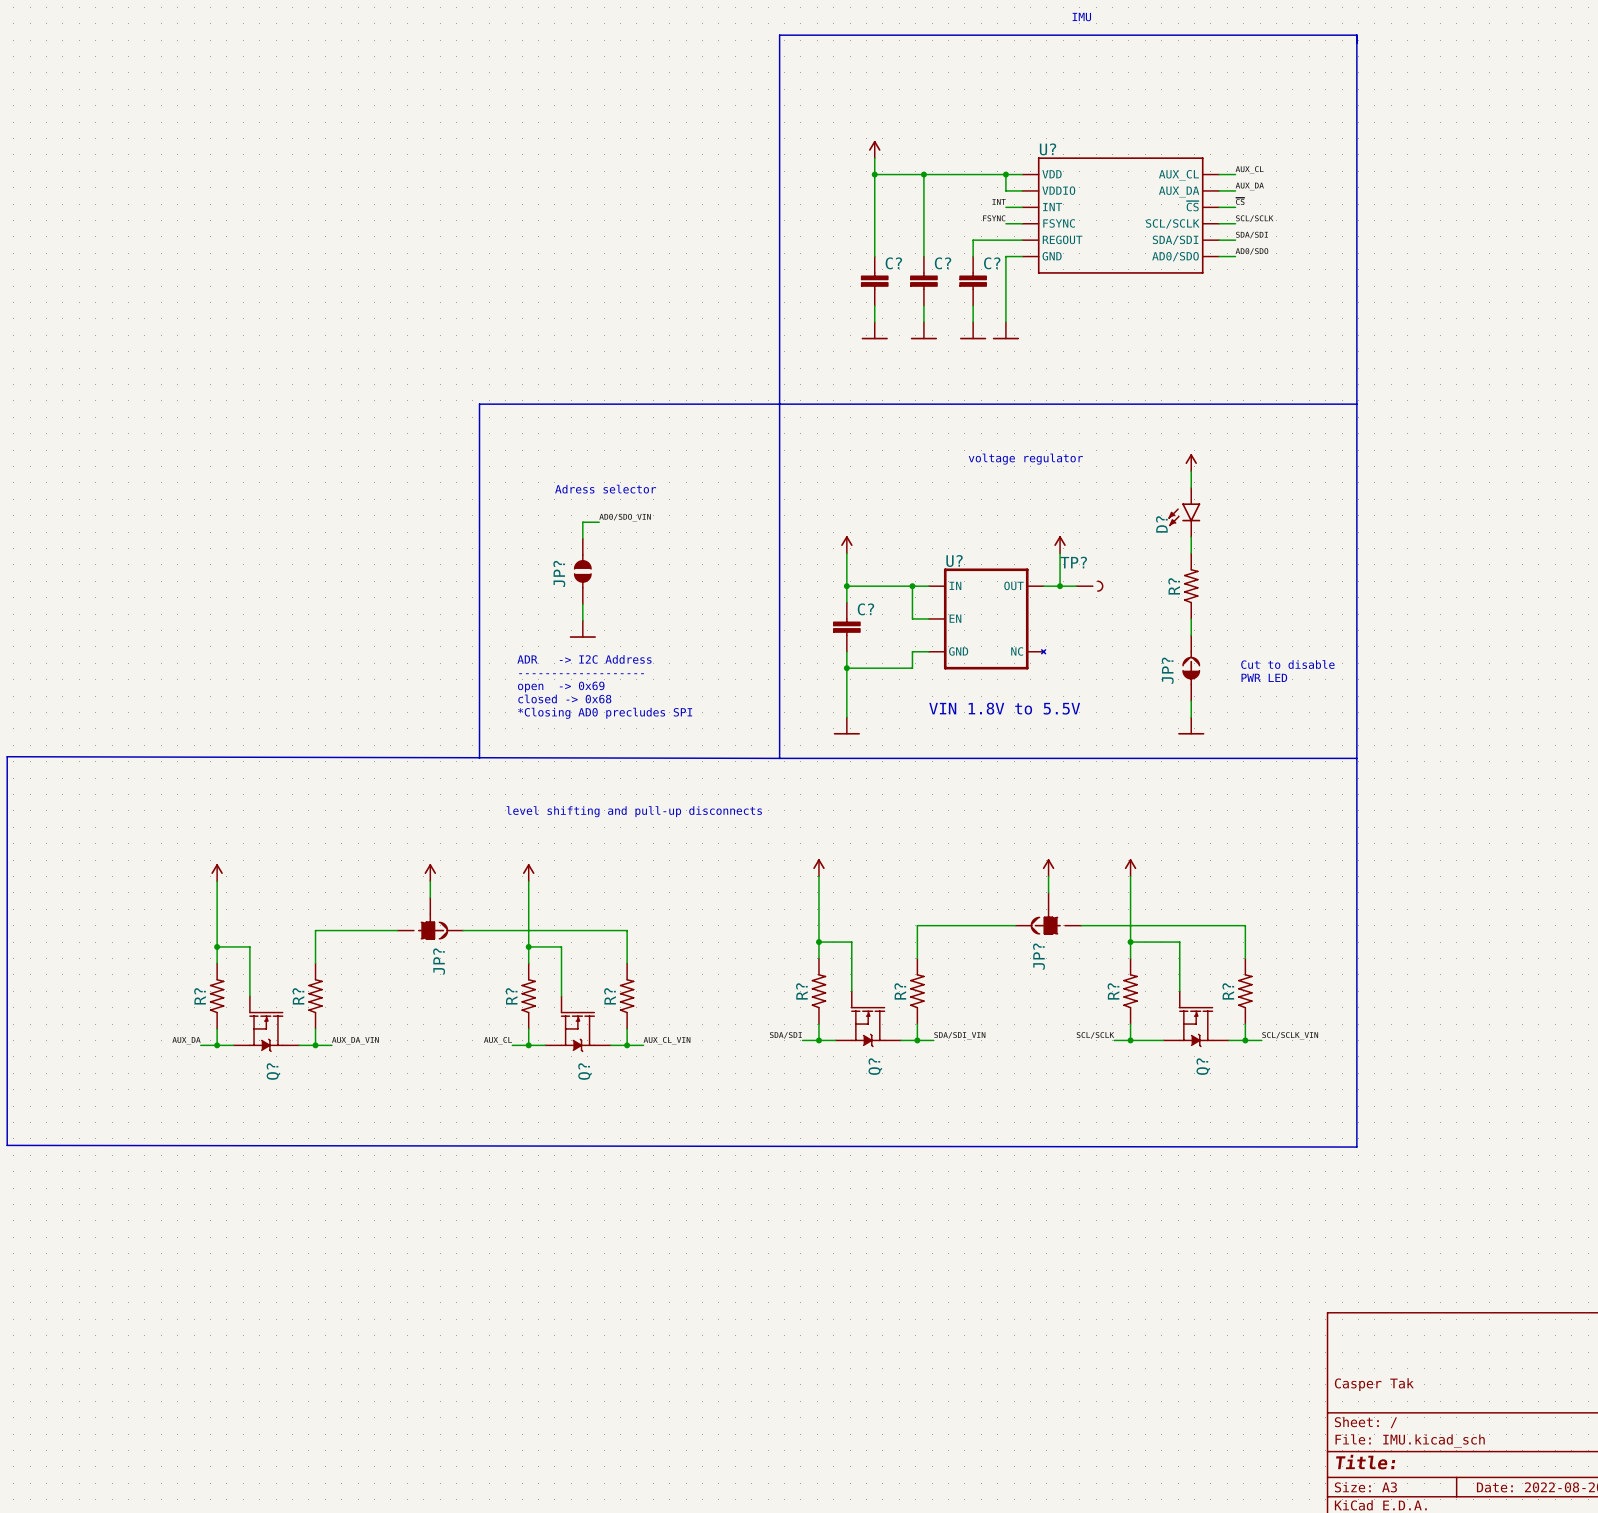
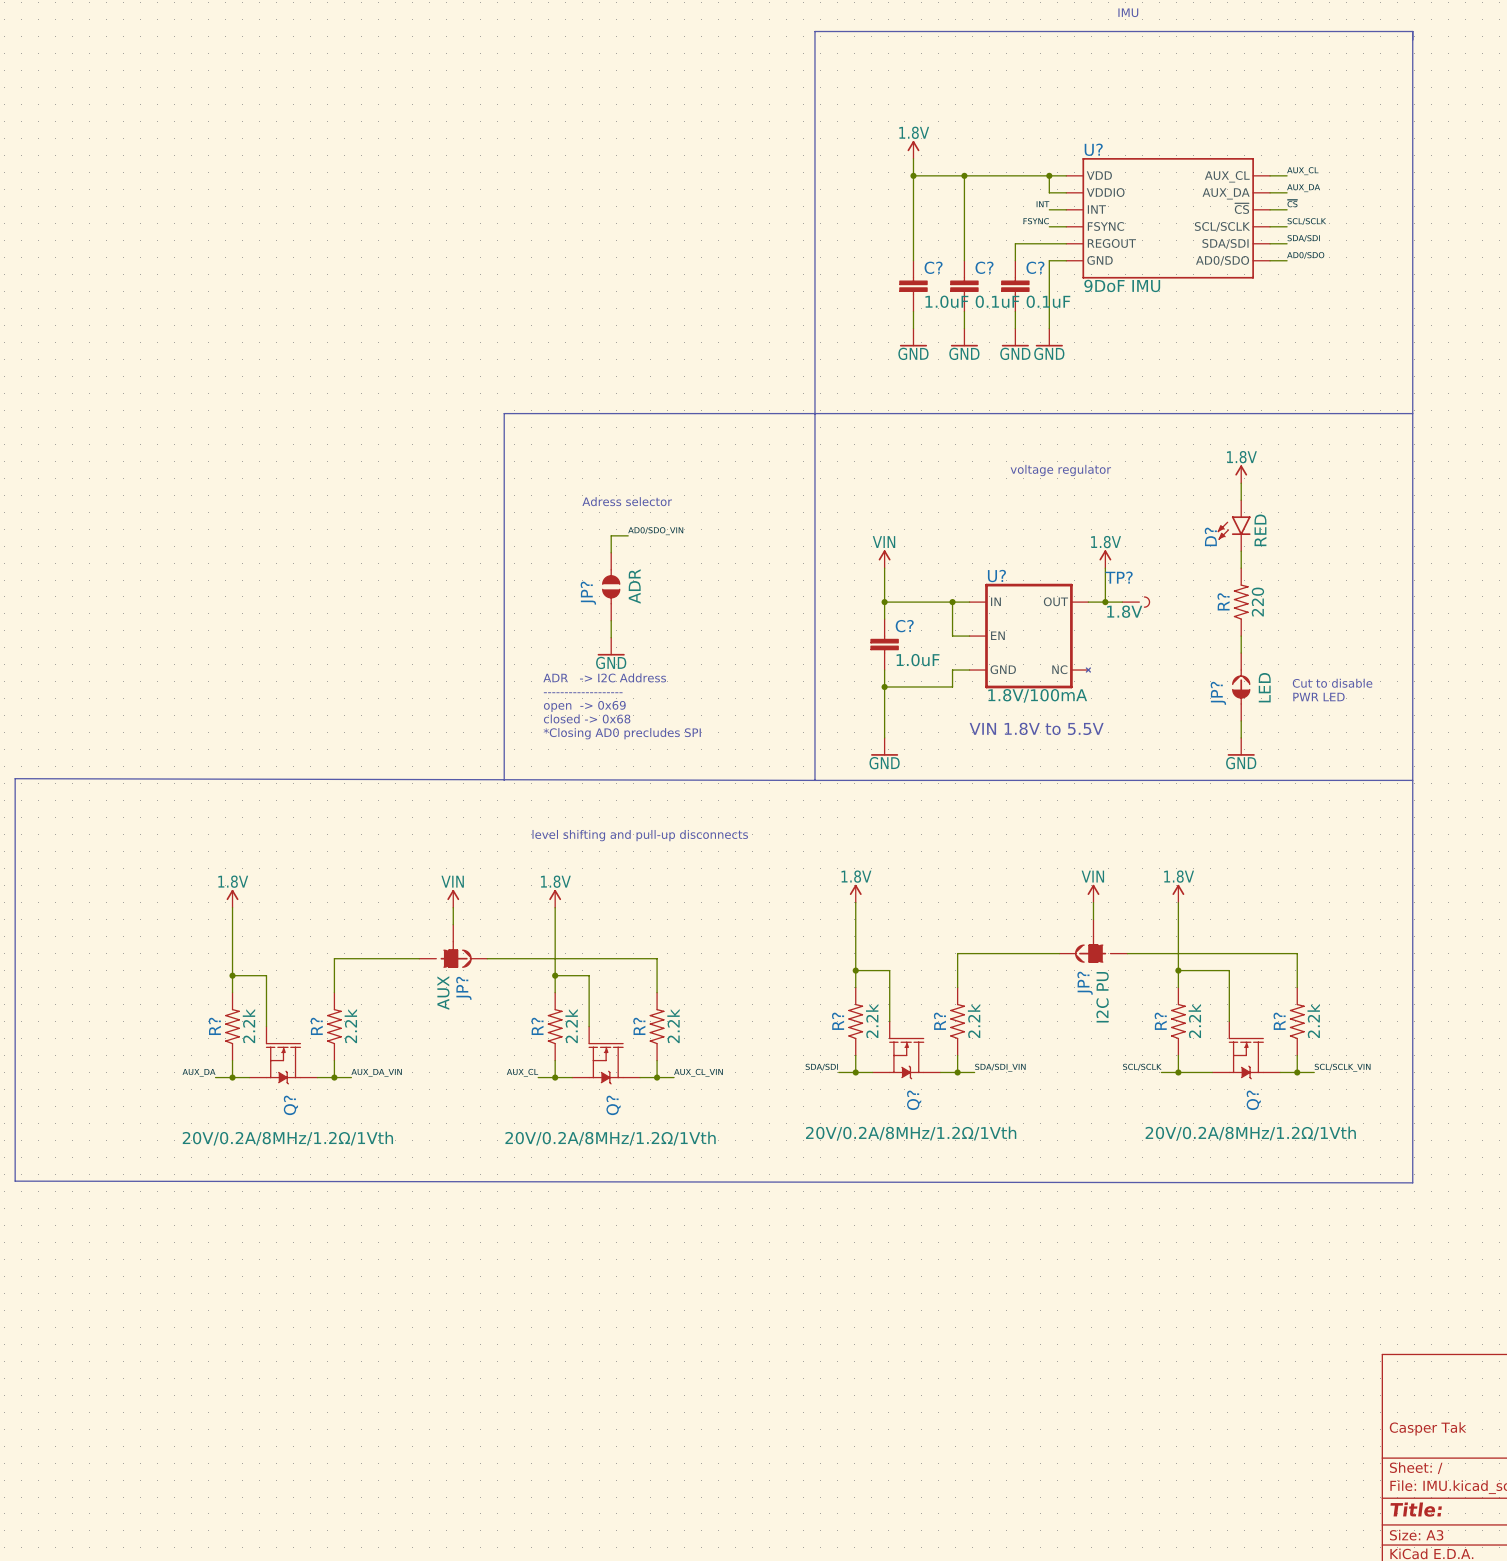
power symbol text: none -> 1.8V (914, 132)
U? value: none -> 9DoF IMU (1122, 285)
C? value: none -> 1.0uF (946, 301)
C? value: none -> 0.1uF (997, 301)
C? value: none -> 0.1uF (1048, 301)
power symbol text: none -> GND (913, 353)
power symbol text: none -> GND (964, 353)
power symbol text: none -> GND (1015, 353)
power symbol text: none -> GND (1049, 353)
power symbol text: none -> 1.8V (1241, 457)
D? value: none -> RED (1260, 530)
power symbol text: none -> VIN (883, 542)
power symbol text: none -> 1.8V (1106, 542)
JP? value: none -> ADR (634, 586)
R? value: none -> 220 (1257, 602)
TP? value: none -> 1.8V (1124, 611)
C? value: none -> 1.0uF (918, 660)
power symbol text: none -> GND (611, 662)
JP? value: none -> LED (1264, 687)
U? value: none -> 1.8V/100mA (1037, 695)
power symbol text: none -> GND (884, 763)
power symbol text: none -> GND (1241, 763)
power symbol text: none -> 1.8V (856, 876)
power symbol text: none -> VIN (1092, 876)
power symbol text: none -> 1.8V (1179, 876)
power symbol text: none -> 1.8V (233, 881)
power symbol text: none -> VIN (452, 881)
power symbol text: none -> 1.8V (555, 881)
JP? value: none -> AUX (443, 993)
JP? value: none -> I2C PU (1102, 997)
R? value: none -> 2.2k (872, 1020)
R? value: none -> 2.2k (974, 1020)
R? value: none -> 2.2k (1194, 1020)
R? value: none -> 2.2k (1313, 1020)
R? value: none -> 2.2k (248, 1026)
R? value: none -> 2.2k (350, 1026)
R? value: none -> 2.2k (571, 1026)
R? value: none -> 2.2k (673, 1026)
Q? value: none -> 20V/0.2A/8MHz/1.2Ω/1Vth (911, 1133)
Q? value: none -> 20V/0.2A/8MHz/1.2Ω/1Vth (1250, 1133)
Q? value: none -> 20V/0.2A/8MHz/1.2Ω/1Vth (287, 1138)
Q? value: none -> 20V/0.2A/8MHz/1.2Ω/1Vth (610, 1138)

